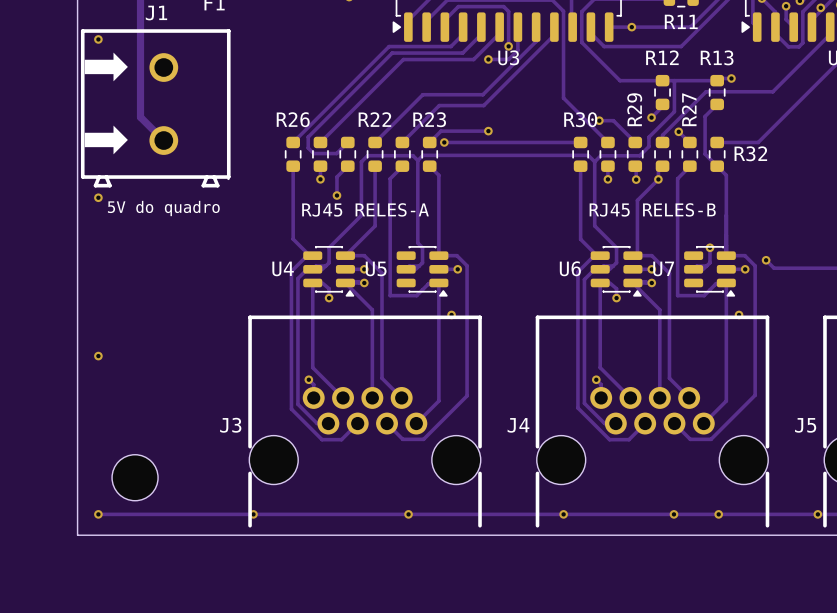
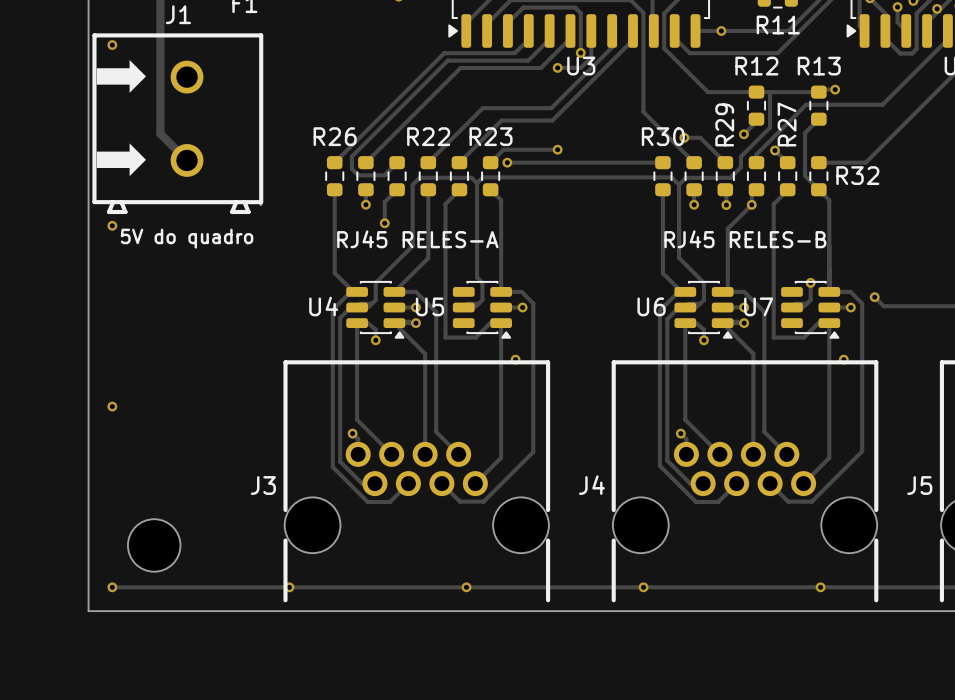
via: (673, 514) -> none
via: (817, 514) -> none

